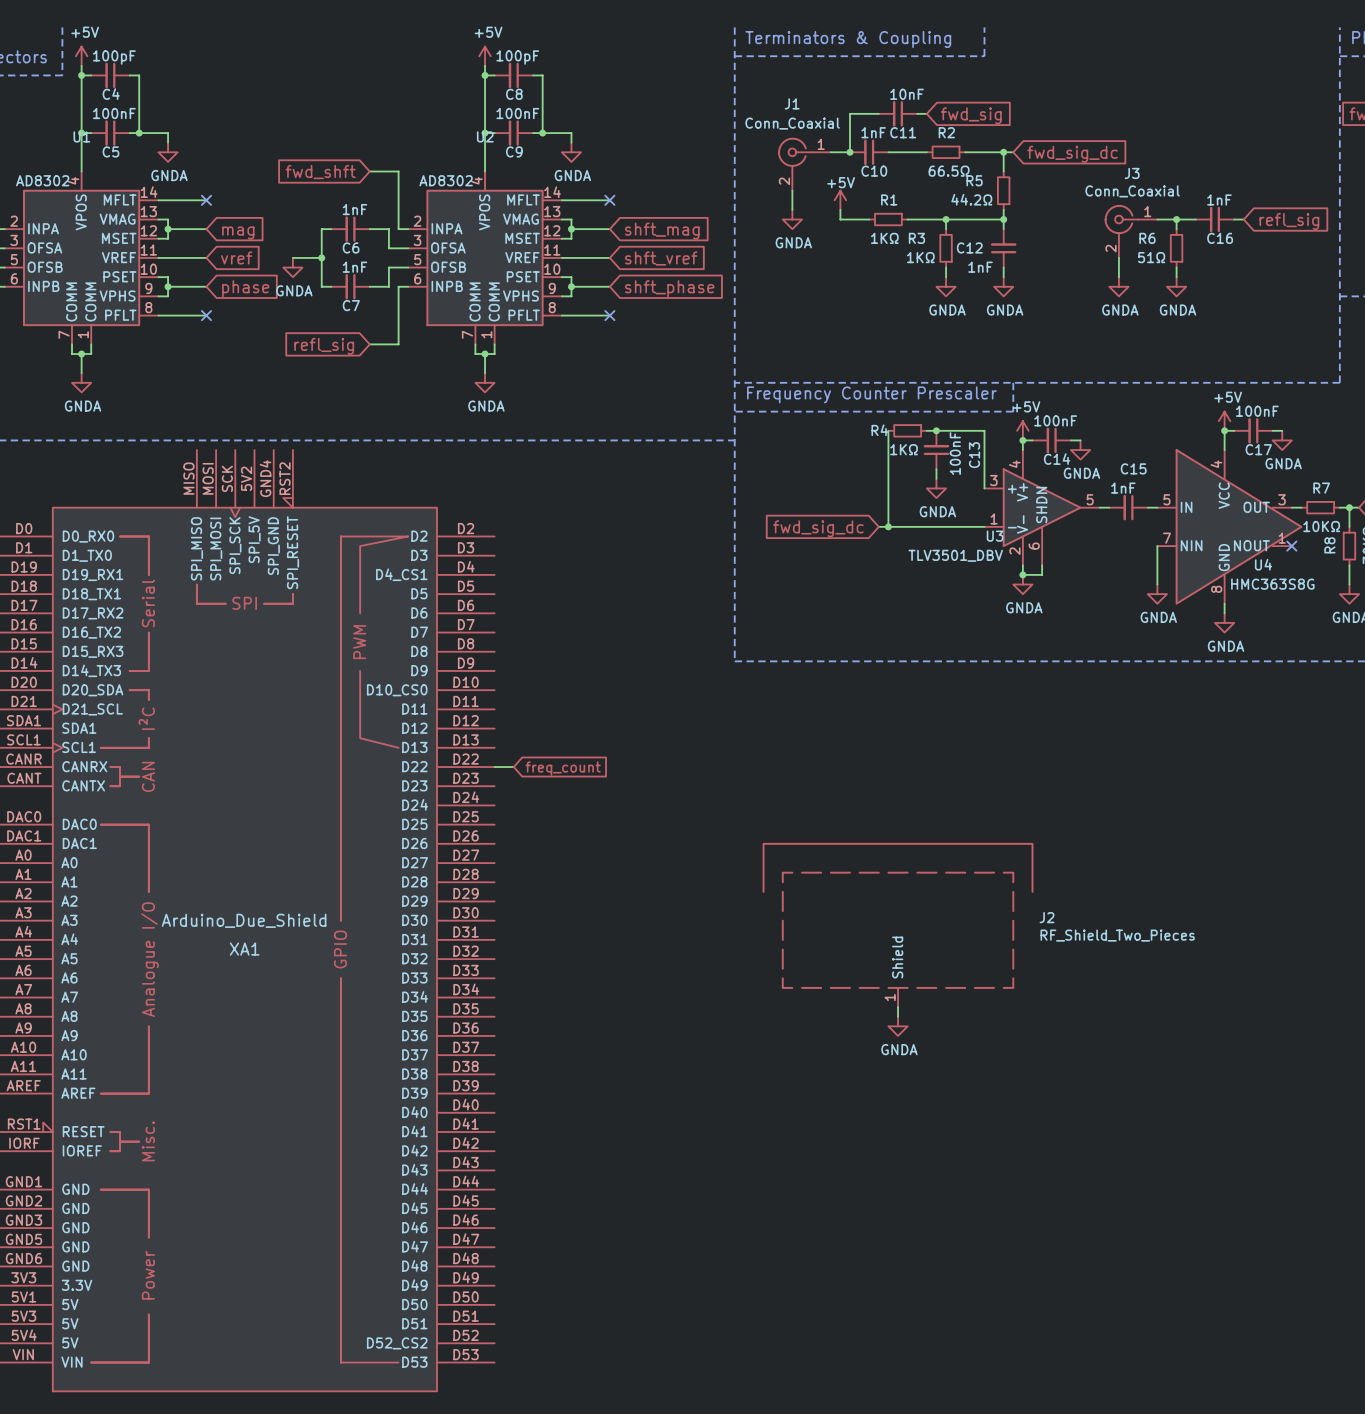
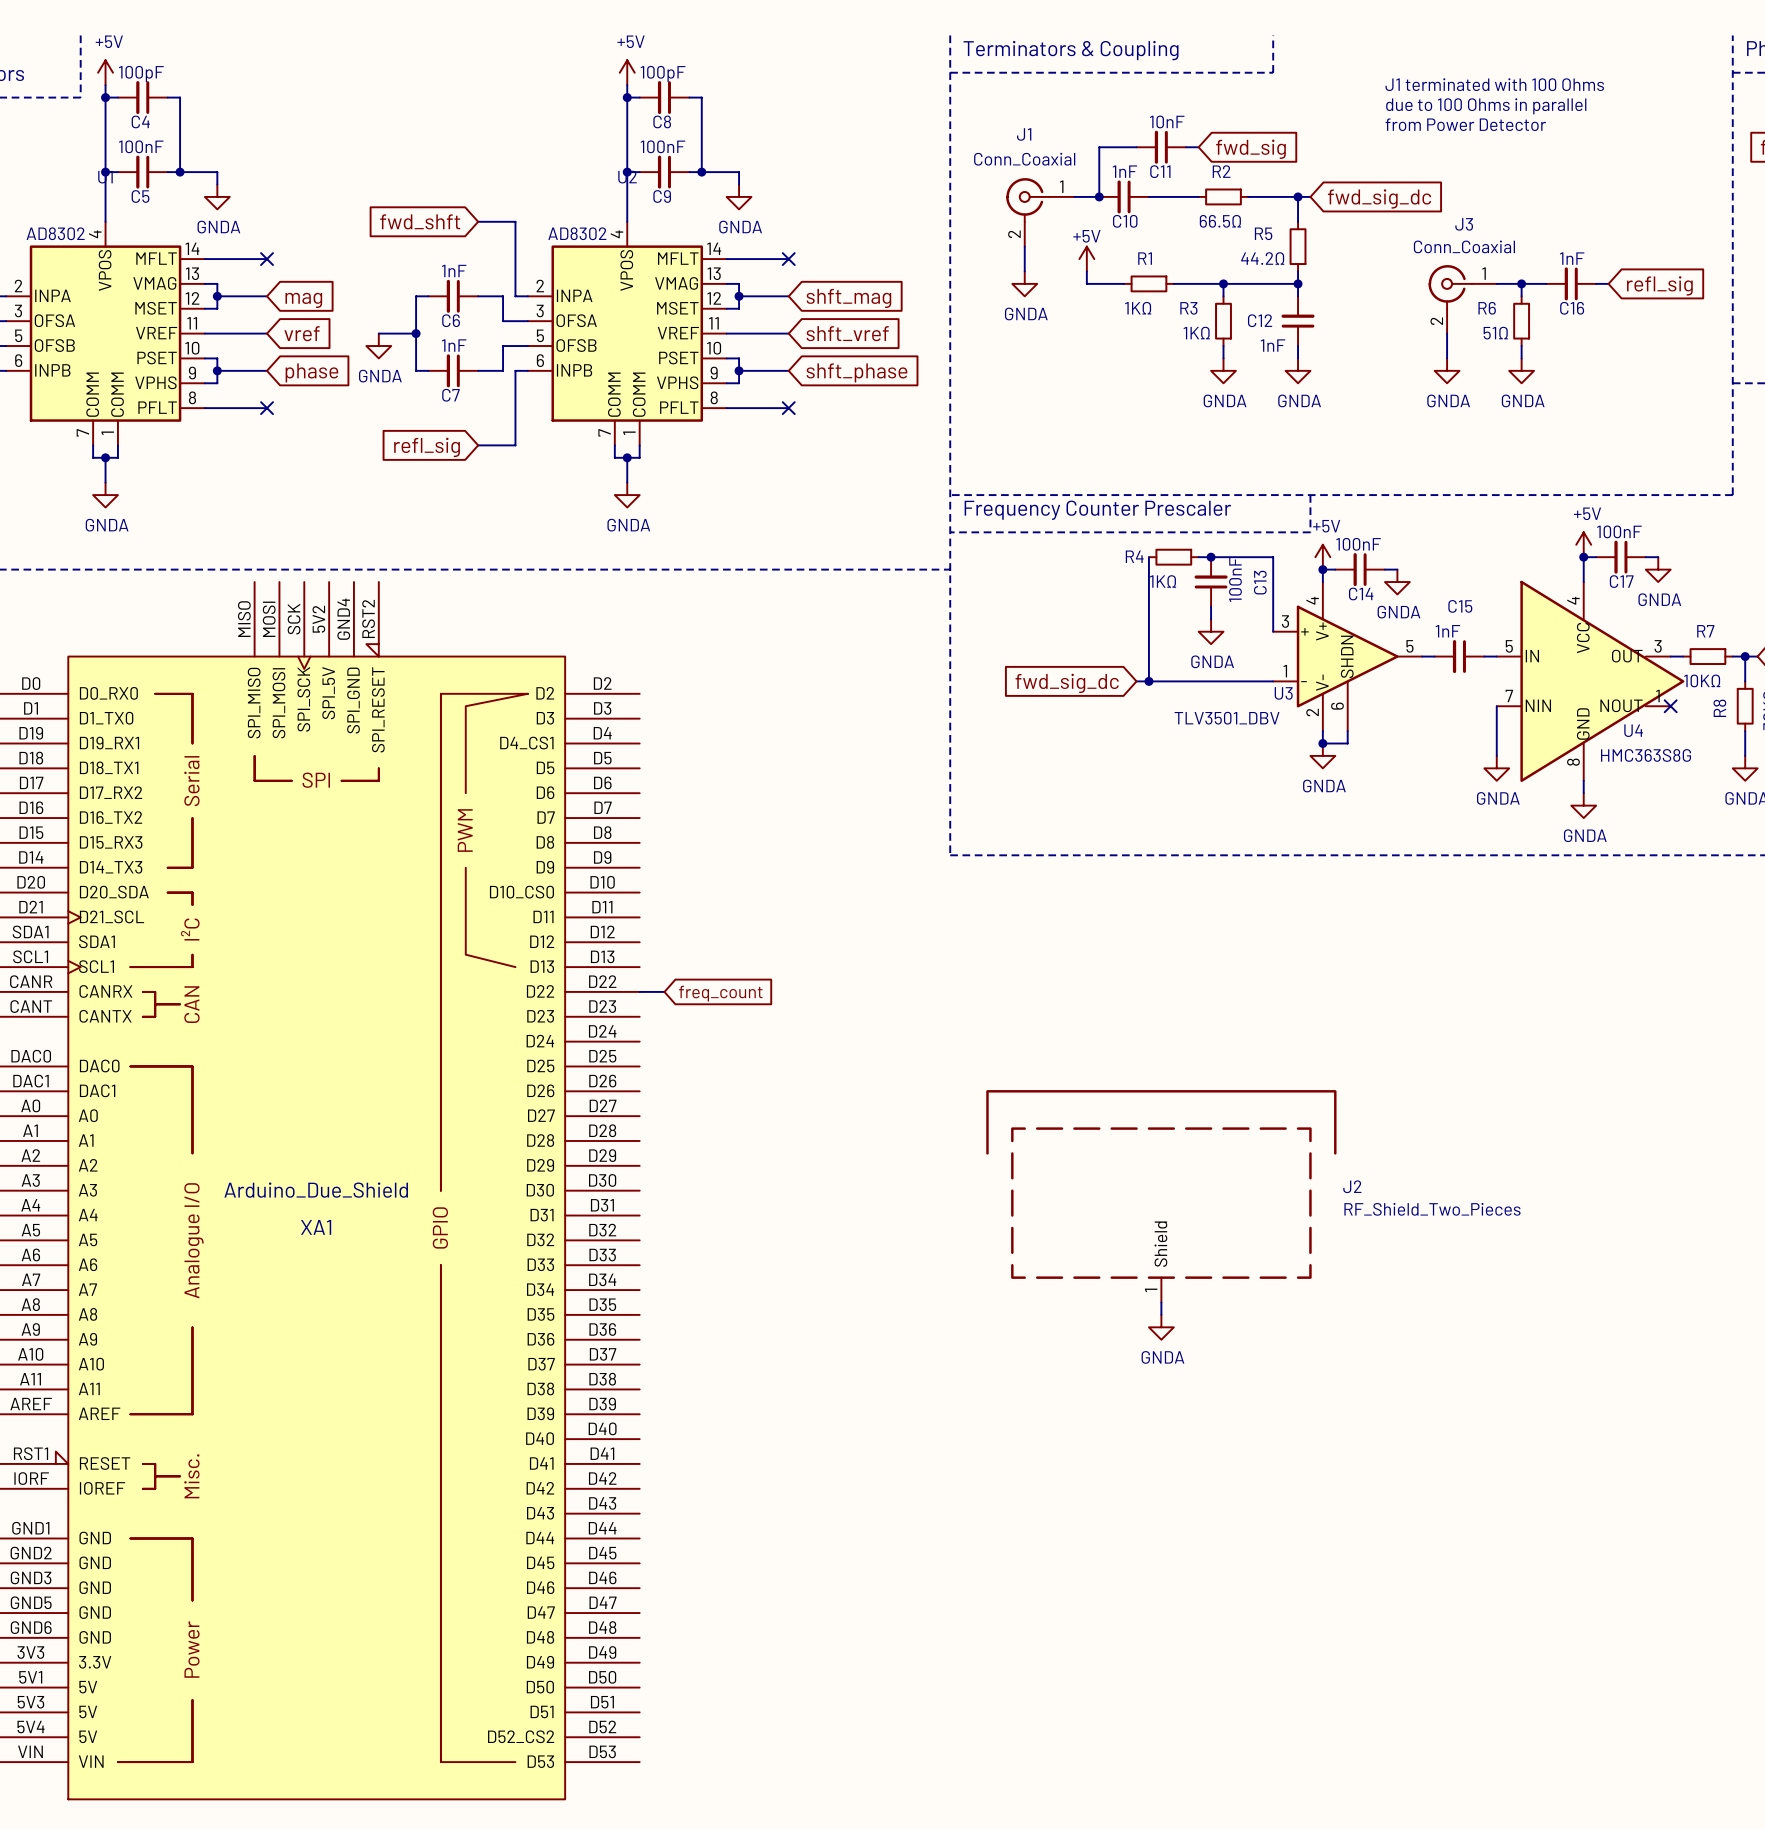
text: none -> J1 terminated with 100 Ohms (1494, 84)
text: none -> due to 100 Ohms in parallel (1486, 106)
text: none -> from Power Detector (1465, 124)

